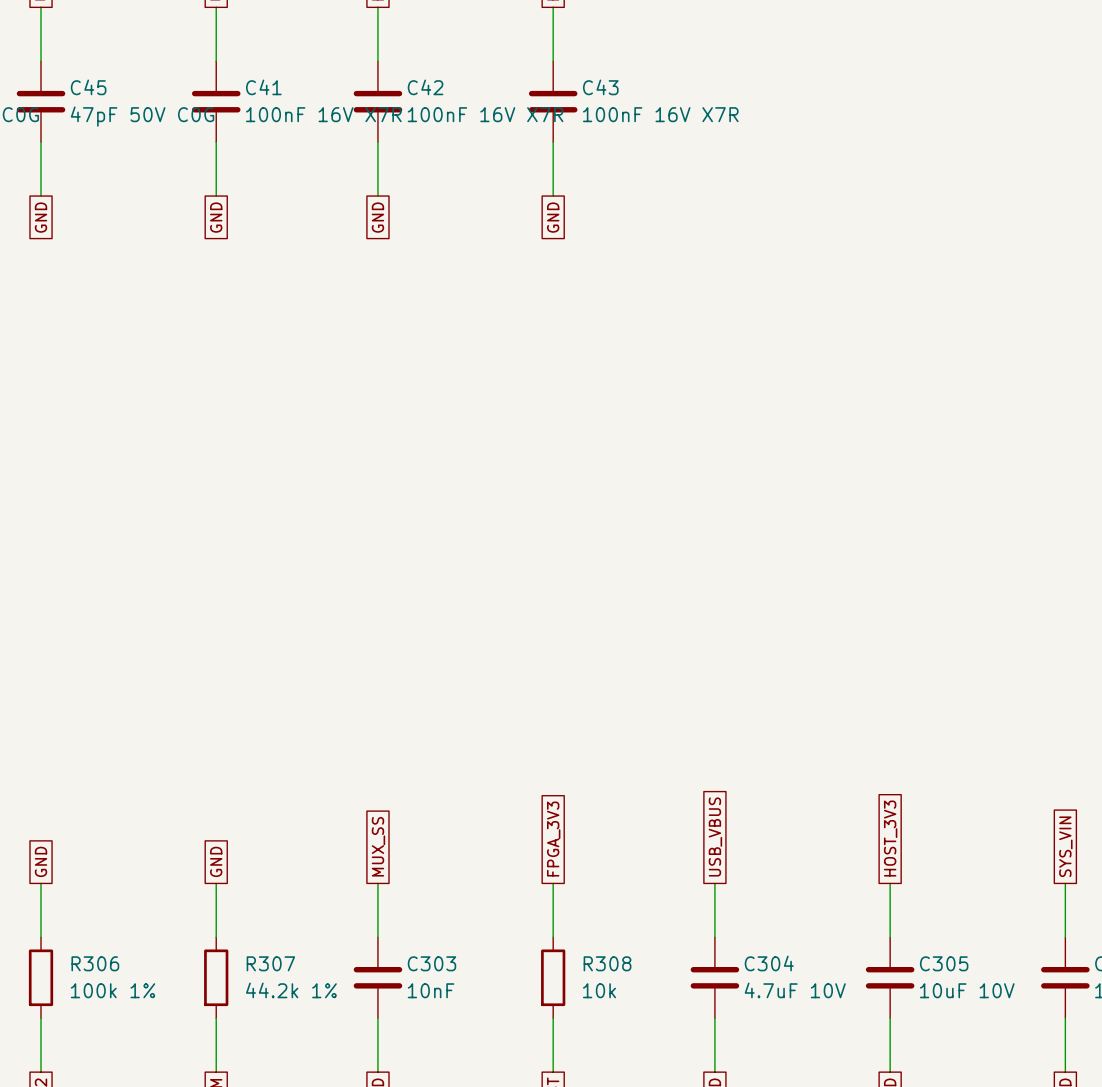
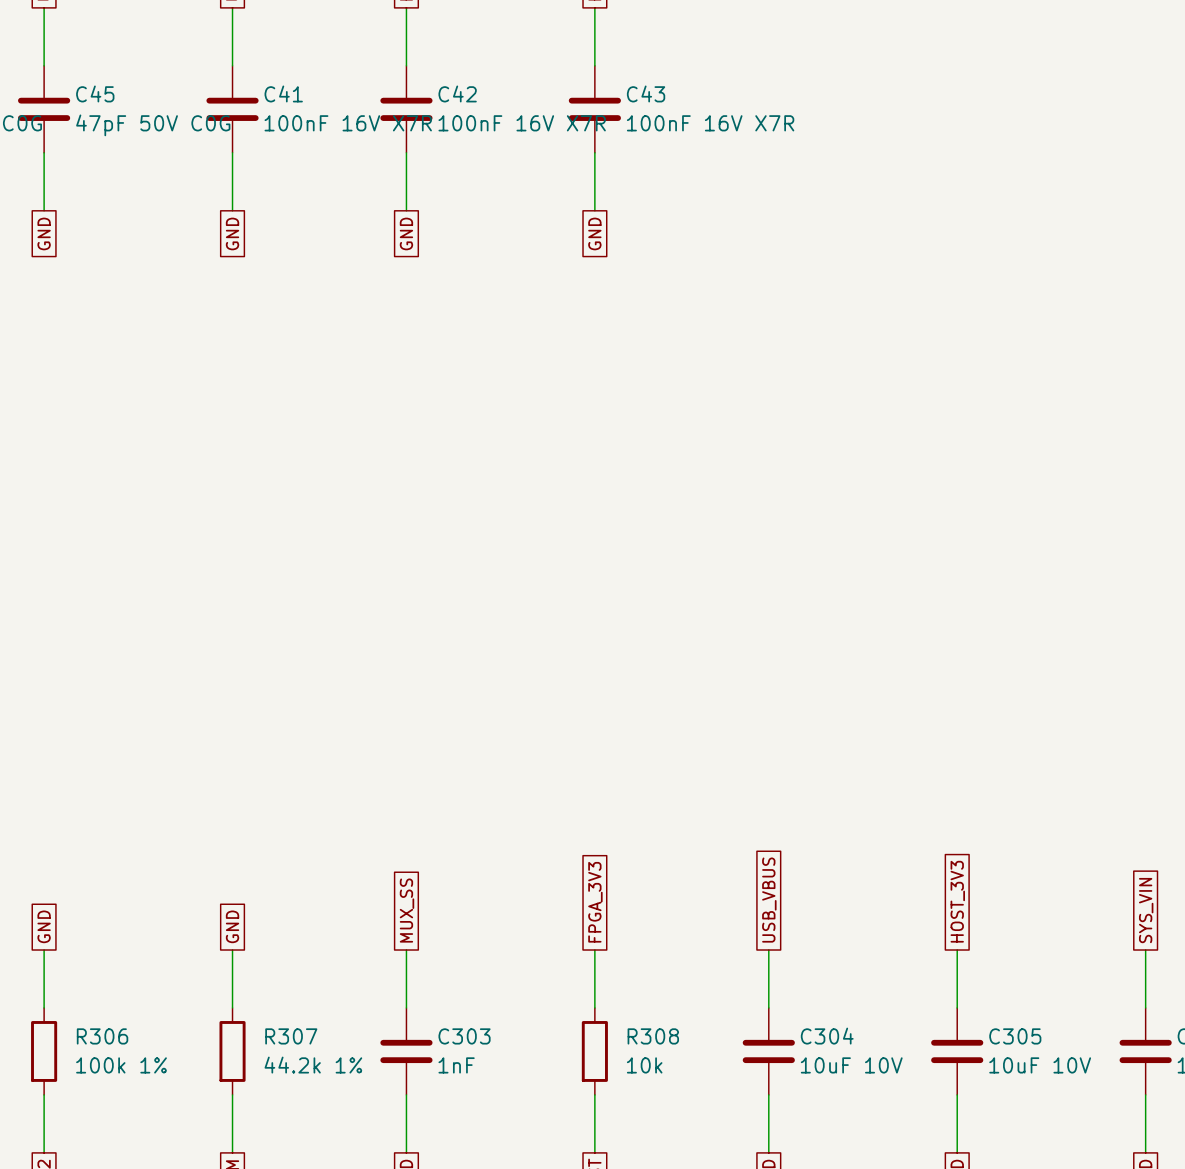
C303 value: 10nF (431, 990) -> 1nF (456, 1065)
C304 value: 4.7uF 10V (795, 990) -> 10uF 10V (851, 1065)

